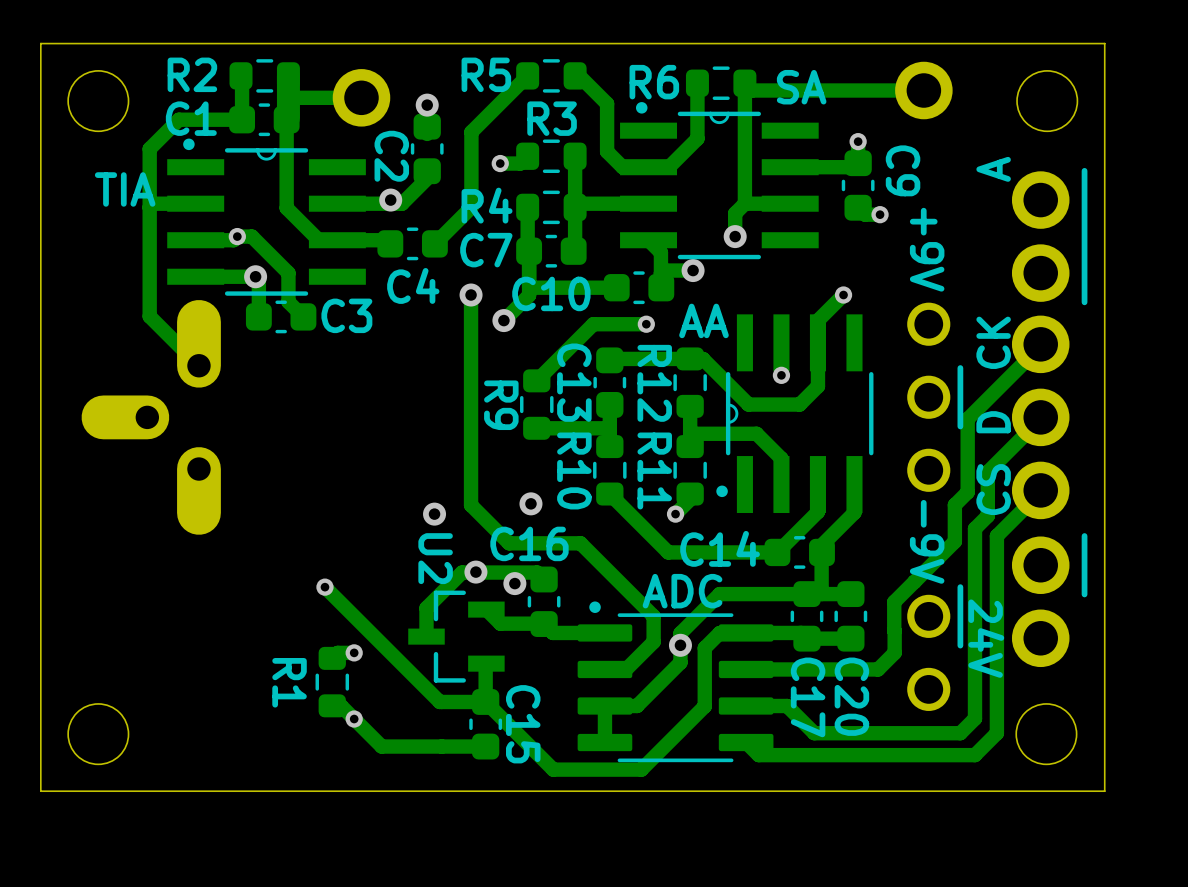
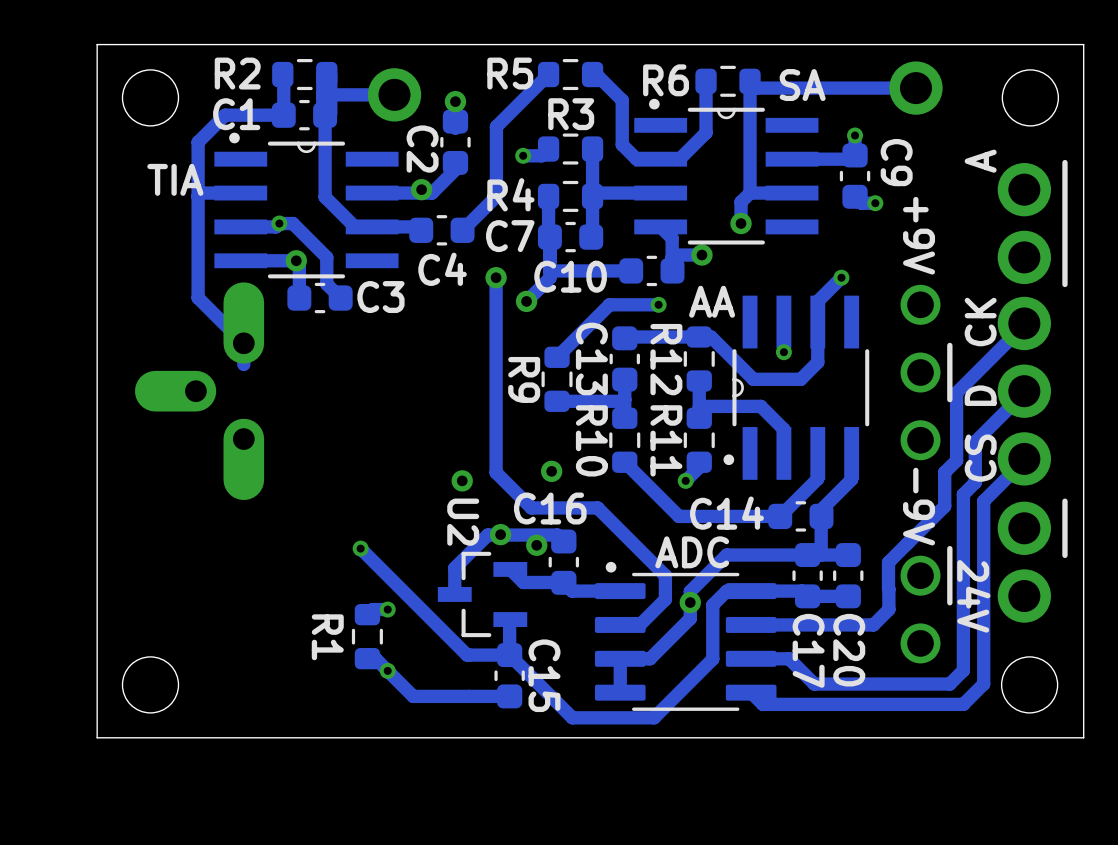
track: (149, 316) (198, 365) -> (198, 297) (243, 343) (243, 364)

